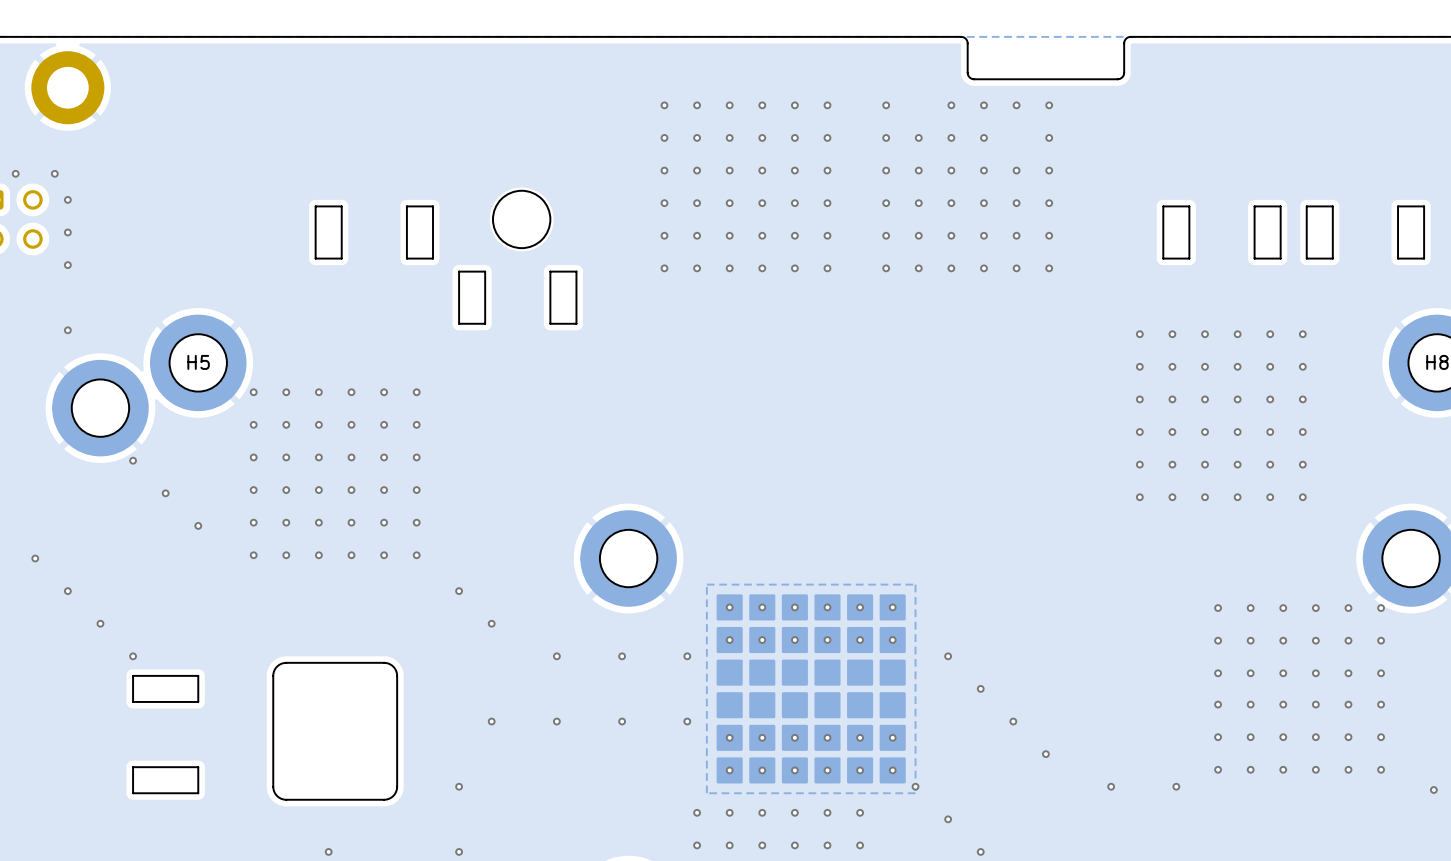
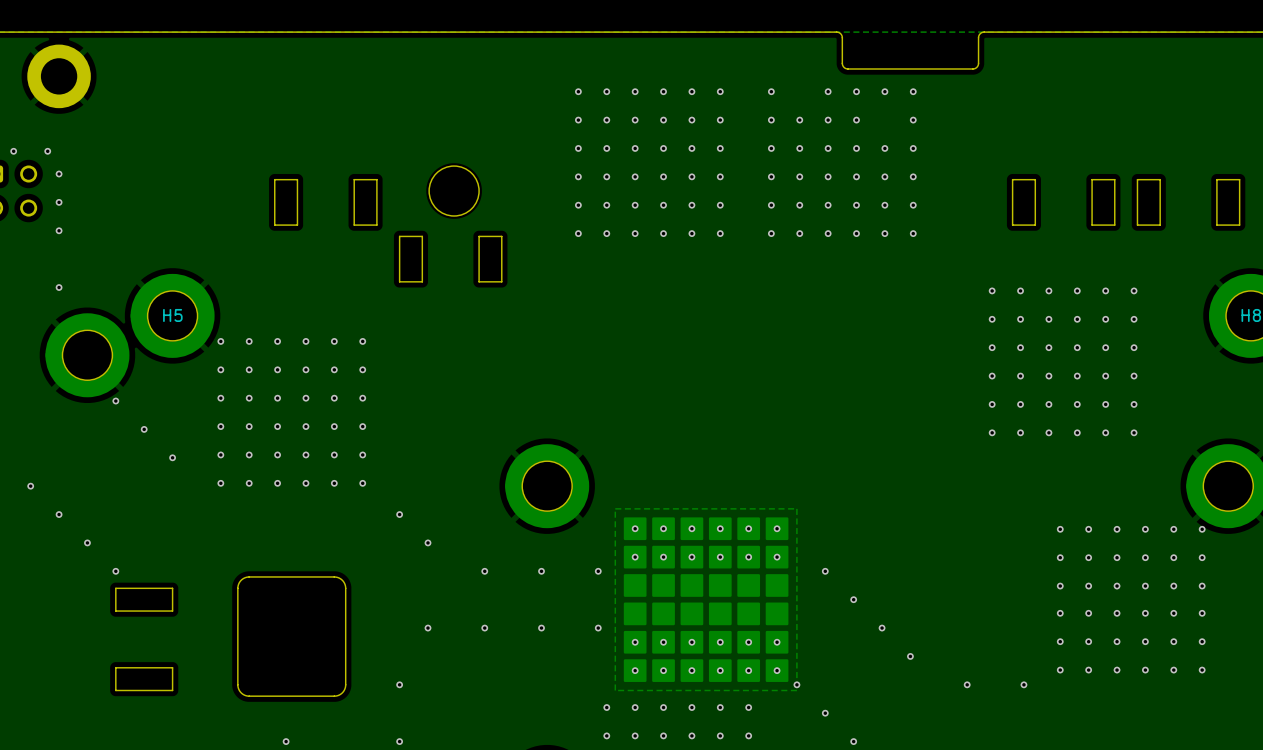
via: (1433, 789) -> none

